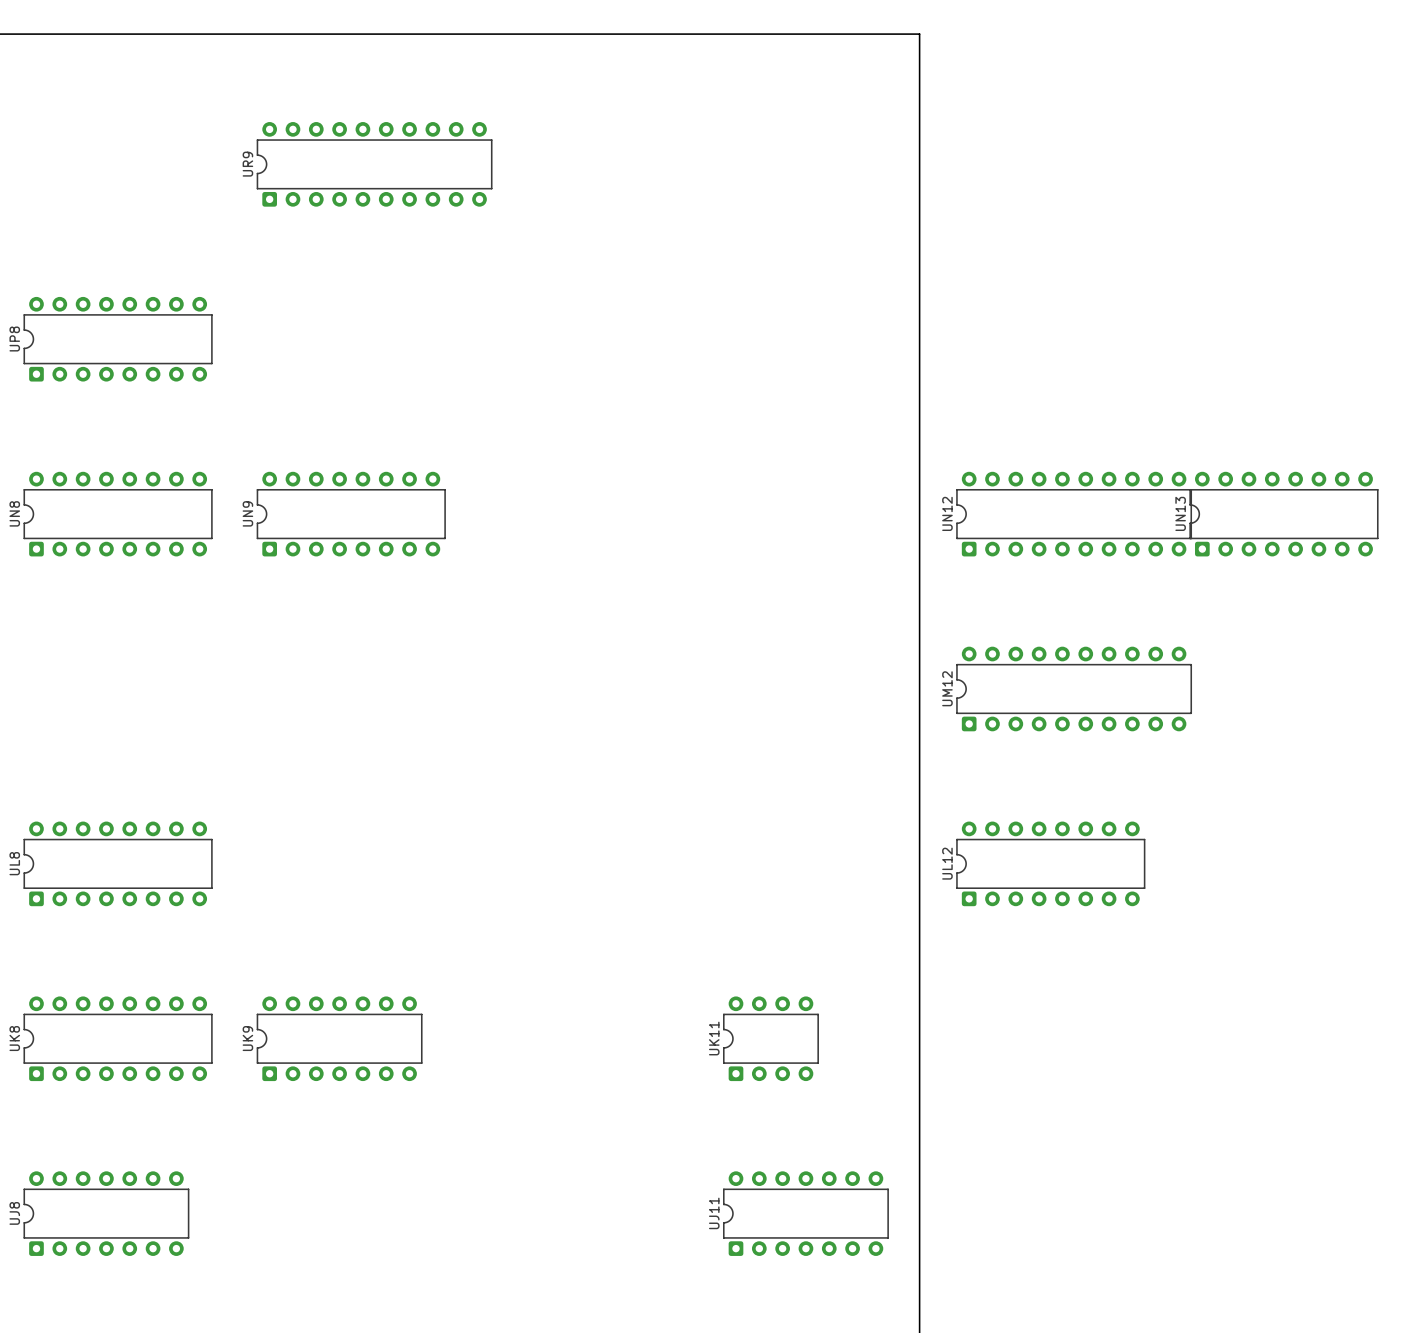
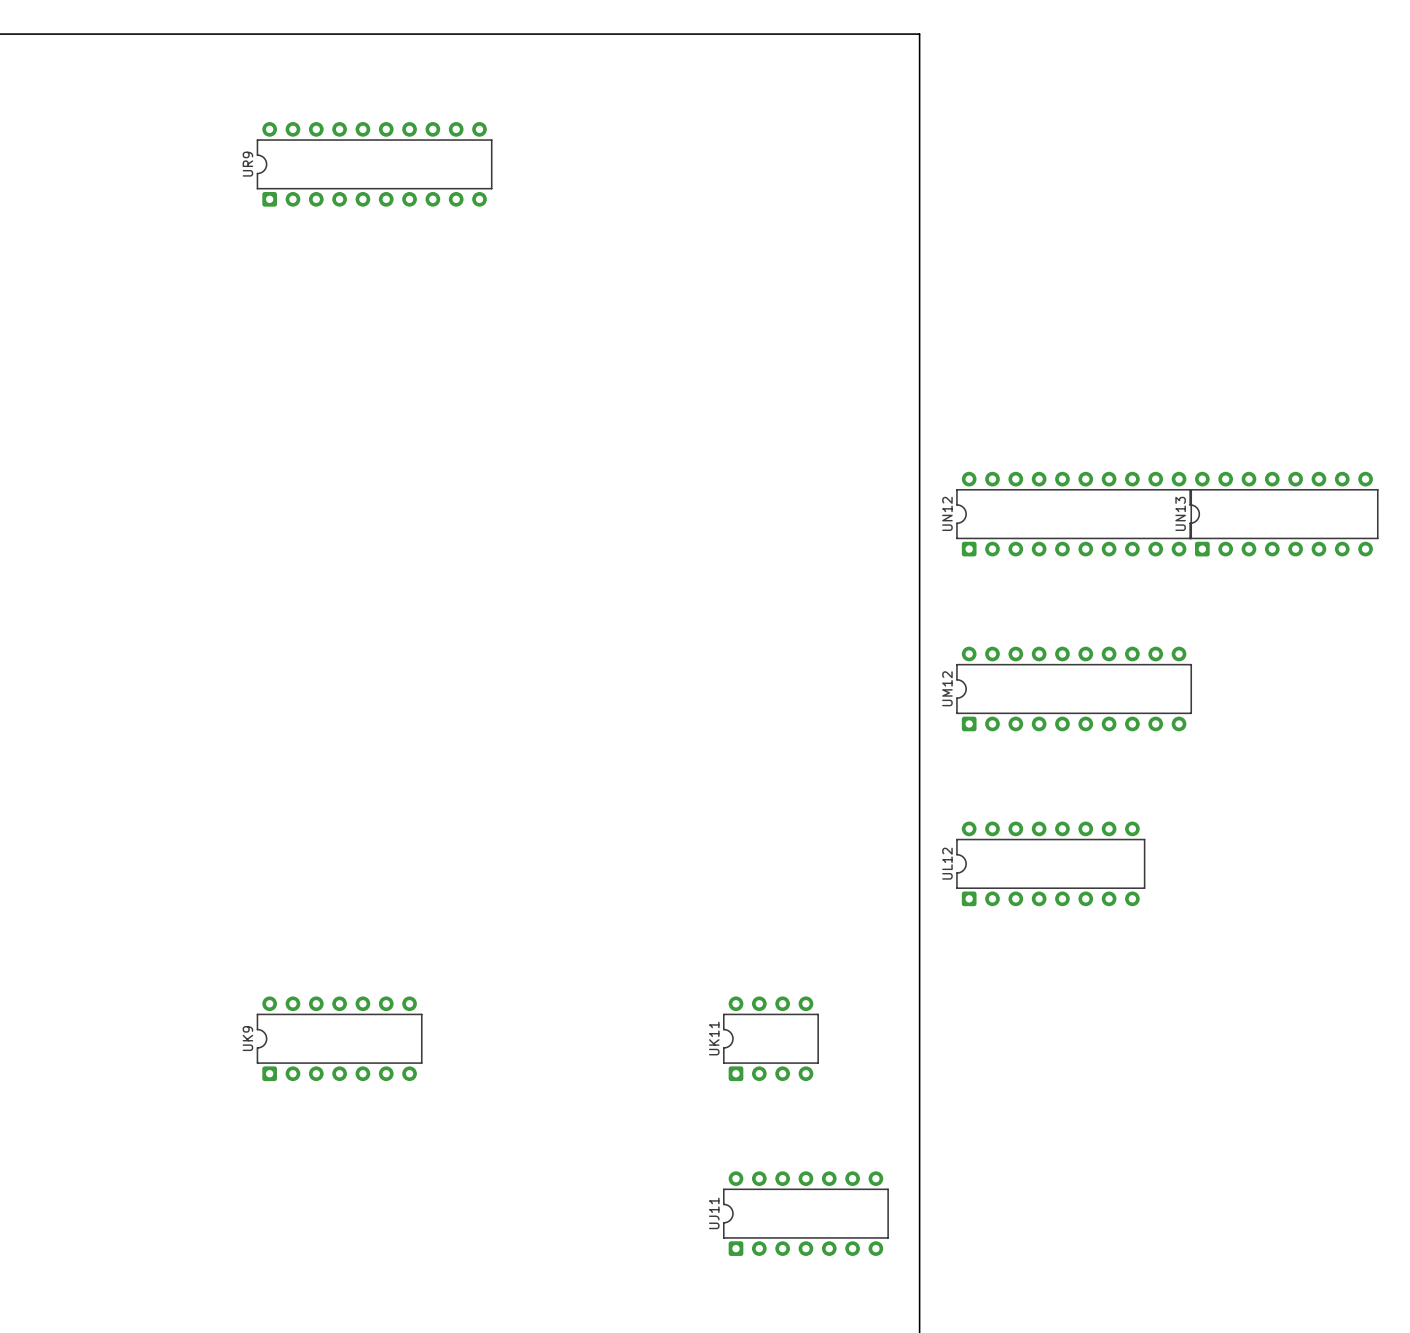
UP8: (118, 339) -> none
UN8: (118, 514) -> none
UN9: (351, 514) -> none
UL8: (118, 863) -> none
UK8: (118, 1038) -> none
UJ8: (106, 1213) -> none

